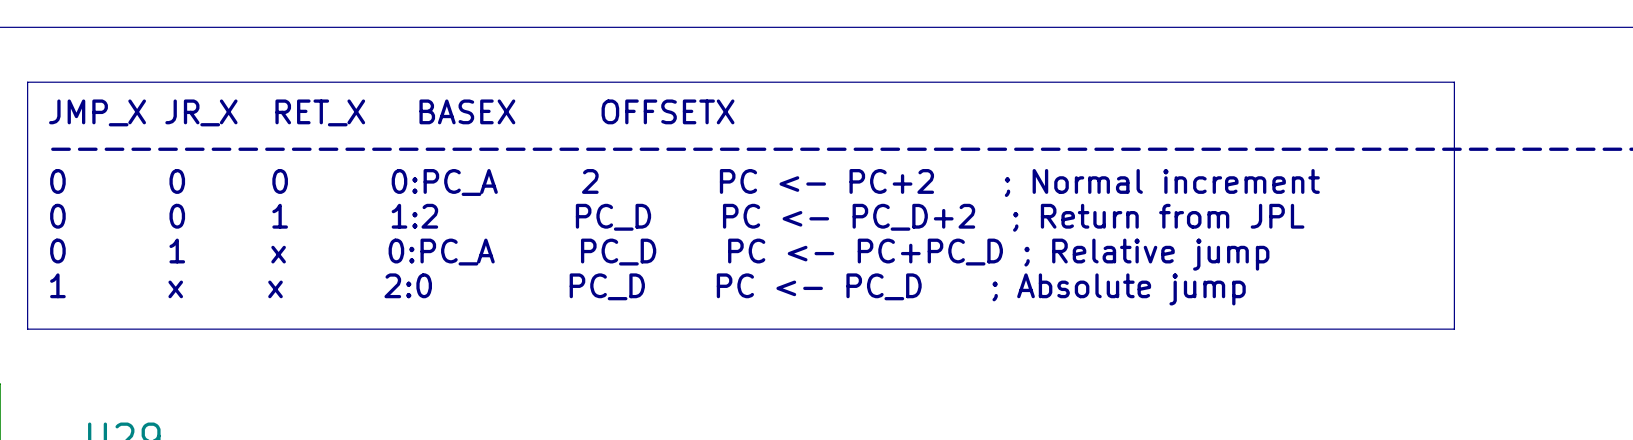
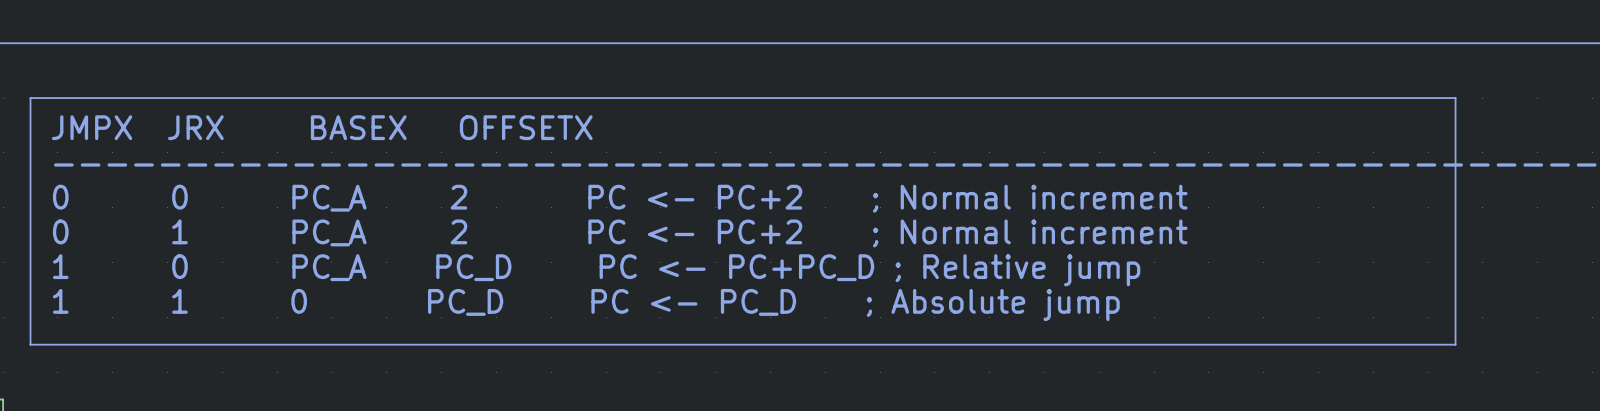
text: JMP_X JR_X RET_X BASEX OFFSETX (391, 112) -> JMPX JRX BASEX OFFSETX (322, 127)
text: 0 0 0 0:PC_A 2 PC <- PC+2 ; Normal increment (684, 183) -> 0 0 PC_A 2 PC <- PC+2 ; Normal increment (620, 198)
text: 0 0 1 1:2 PC_D PC <- PC_D+2 ; Return from JPL (677, 217) -> 0 1 PC_A 2 PC <- PC+2 ; Normal increment (620, 233)
text: 0 1 x 0:PC_A PC_D PC <- PC+PC_D ; Relative jump (659, 254) -> 1 0 PC_A PC_D PC <- PC+PC_D ; Relative jump (596, 270)
text: 1 x x 2:0 PC_D PC <- PC_D ; Absolute jump (647, 289) -> 1 1 0 PC_D PC <- PC_D ; Absolute jump (586, 304)

